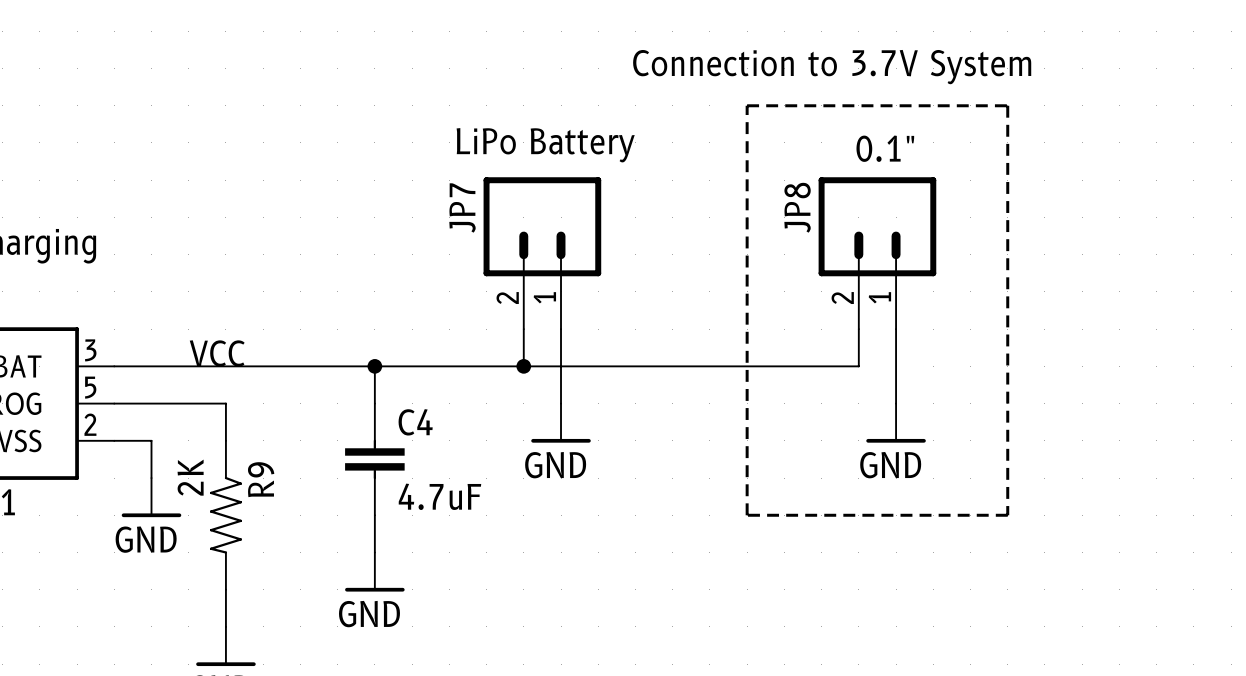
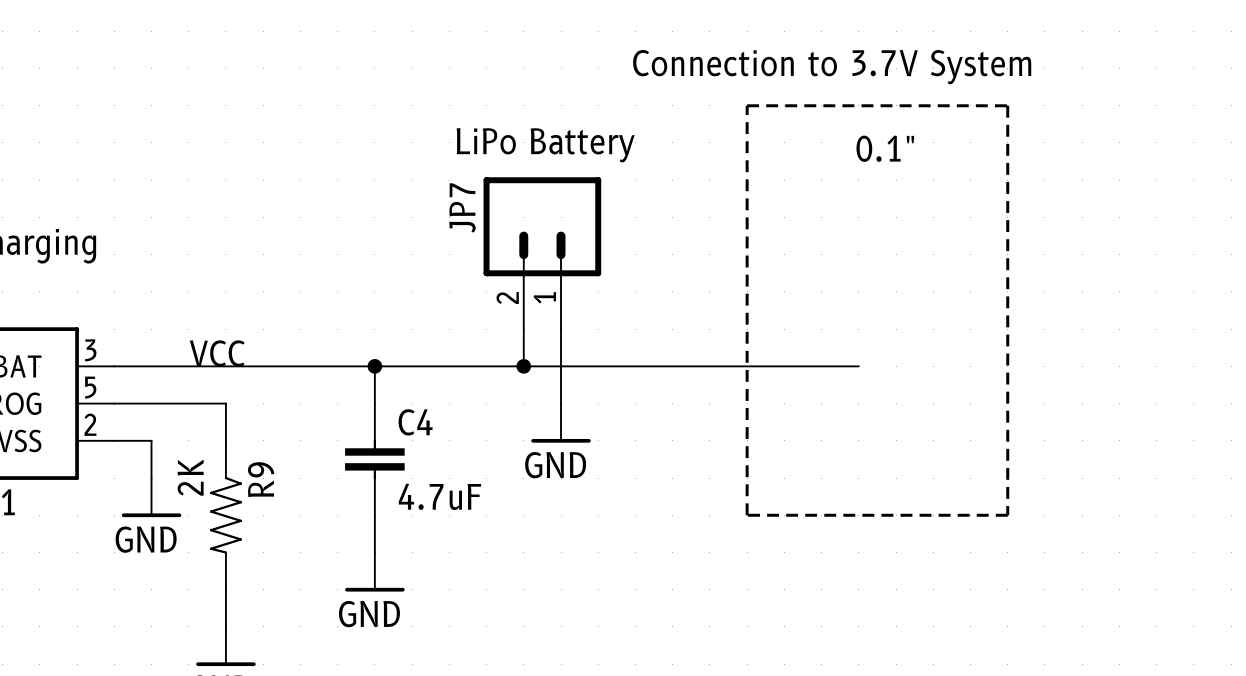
JP8: (877, 253) -> none
wire: (858, 329) (858, 366) -> none
wire: (896, 329) (896, 403) -> none
power symbol: GND (896, 423) -> none

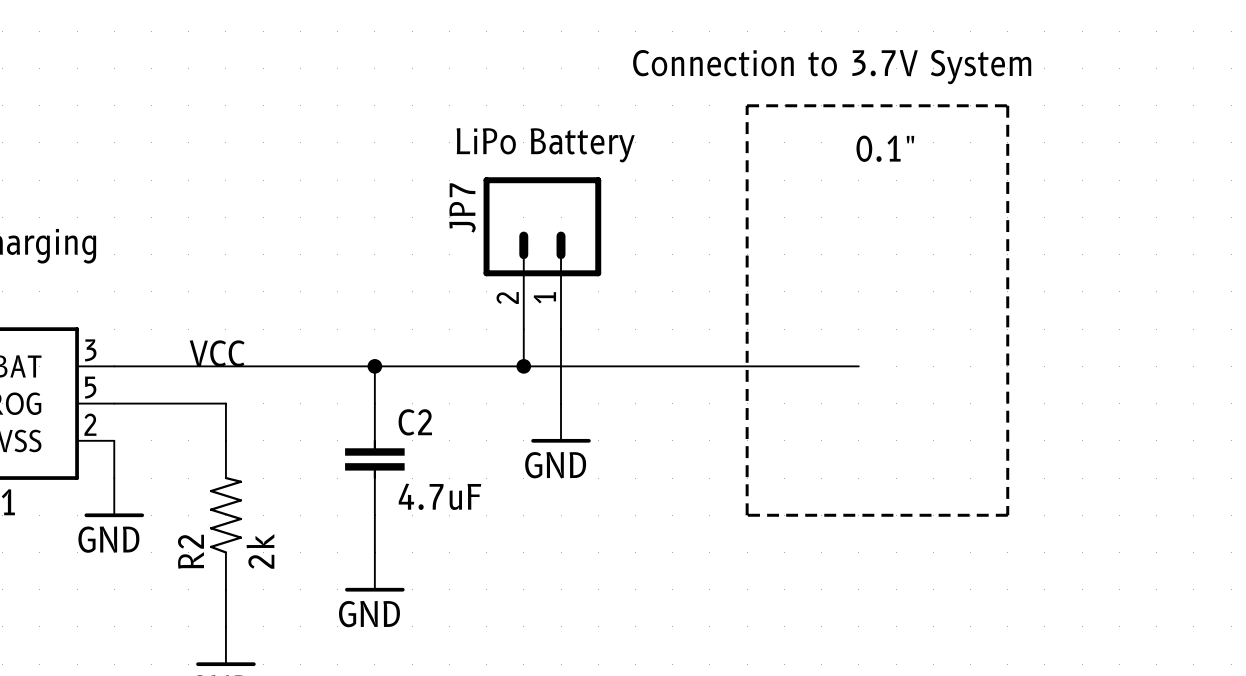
C4 name: C4 (415, 422) -> C2 (415, 422)
wire: (114, 440) (151, 440) (151, 478) -> (114, 440) (114, 478)
power symbol position: GND (151, 497) -> GND (114, 497)
R9: 2K (225, 515) -> none
R2: none -> 2k (225, 515)

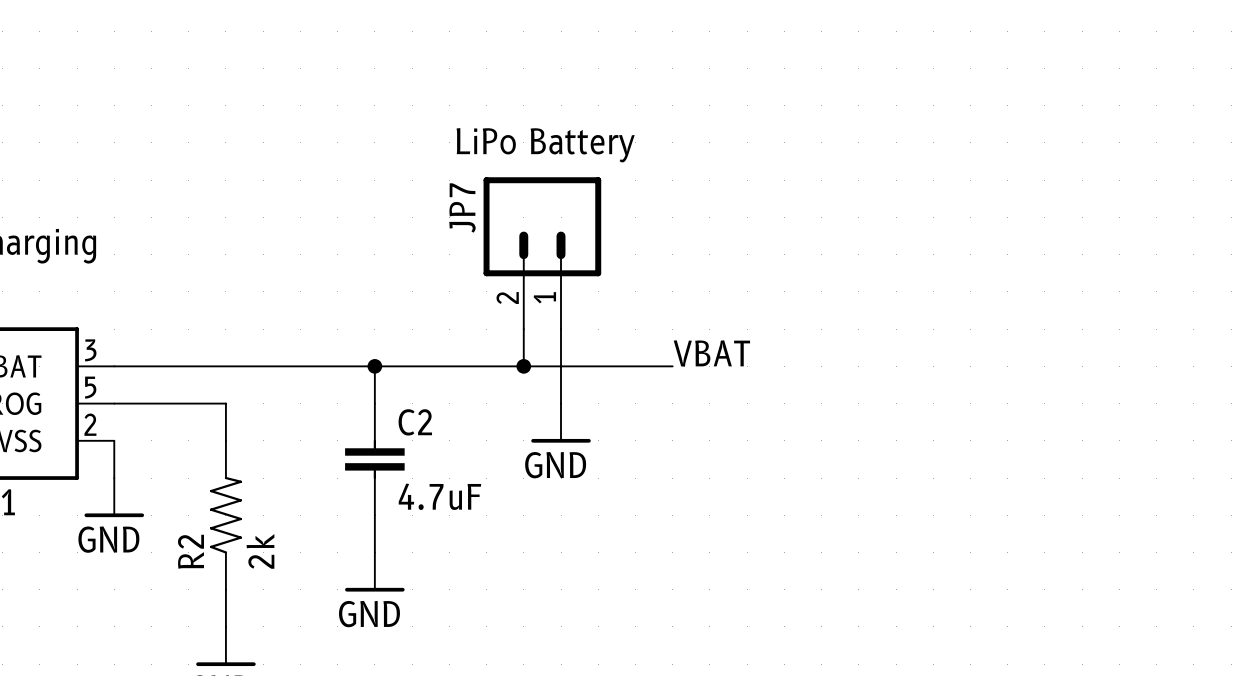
text: Connection to 3.7V System (832, 67) -> none
line: (747, 105) (1007, 105) (1007, 515) (747, 515) (747, 105) -> none
text: 0.1" (885, 148) -> none
label: VCC (217, 353) -> none
label: none -> VBAT (711, 353)
wire: (672, 366) (858, 366) -> none

